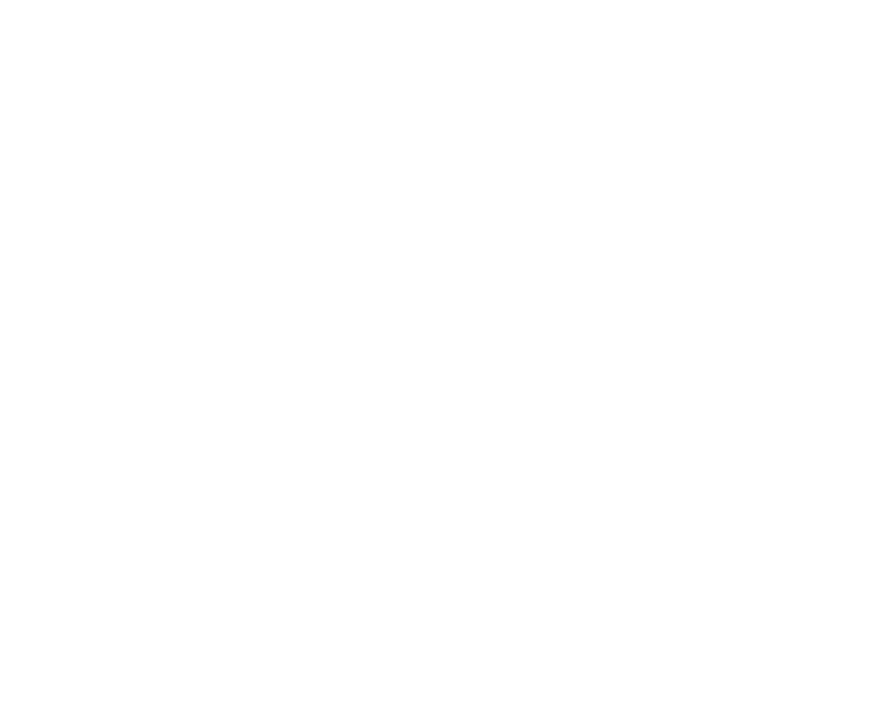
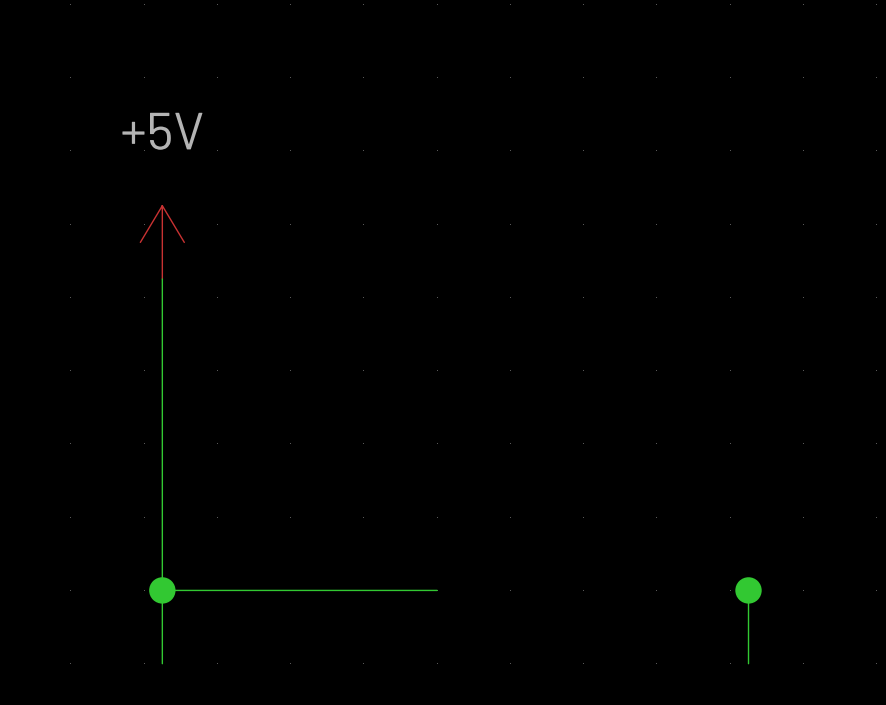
power symbol: none -> +5V (162, 242)
wire: none -> (162, 279) (162, 663)
wire: none -> (162, 590) (437, 590)
junction: none -> (162, 590)
wire: none -> (748, 590) (748, 663)
junction: none -> (748, 590)

